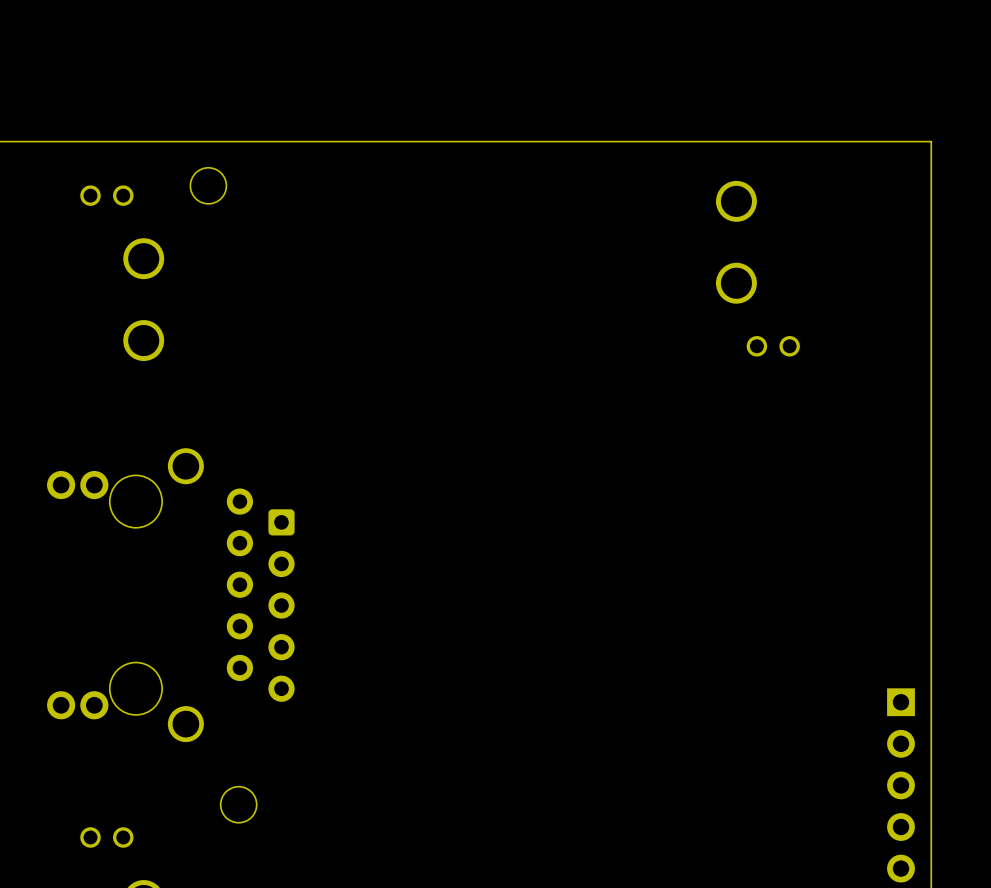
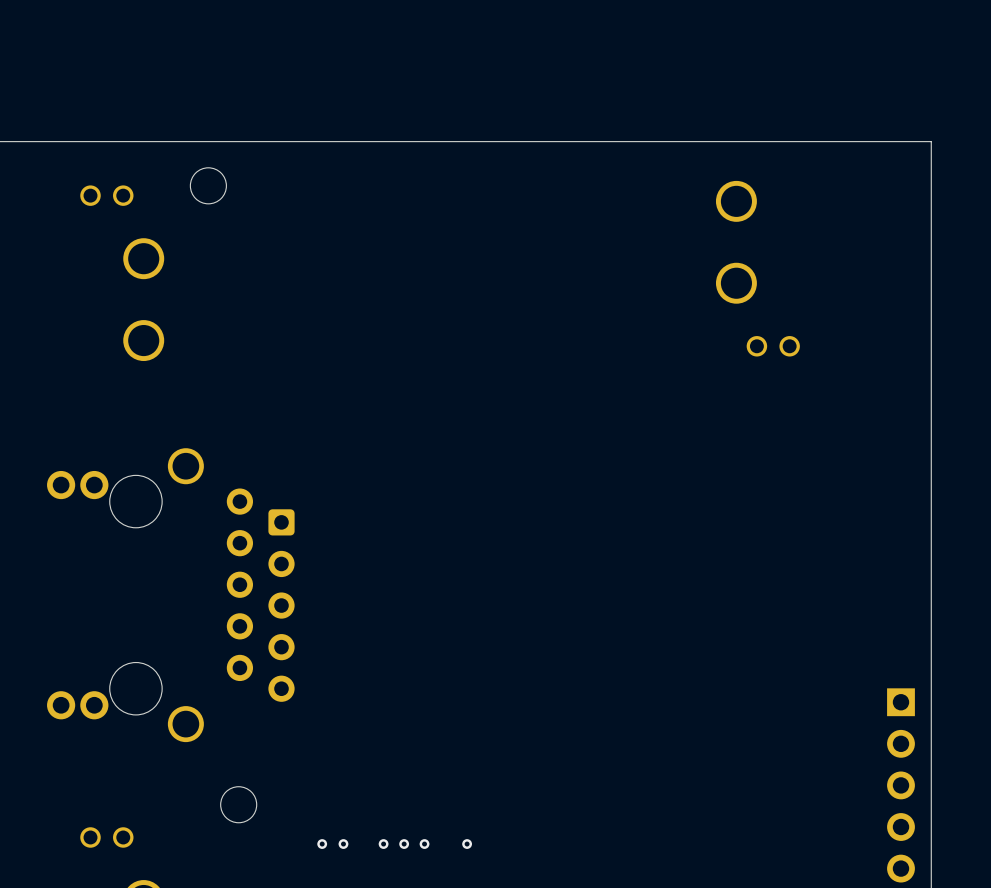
via: none -> (322, 844)
via: none -> (343, 844)
via: none -> (383, 844)
via: none -> (404, 844)
via: none -> (424, 844)
via: none -> (467, 844)

